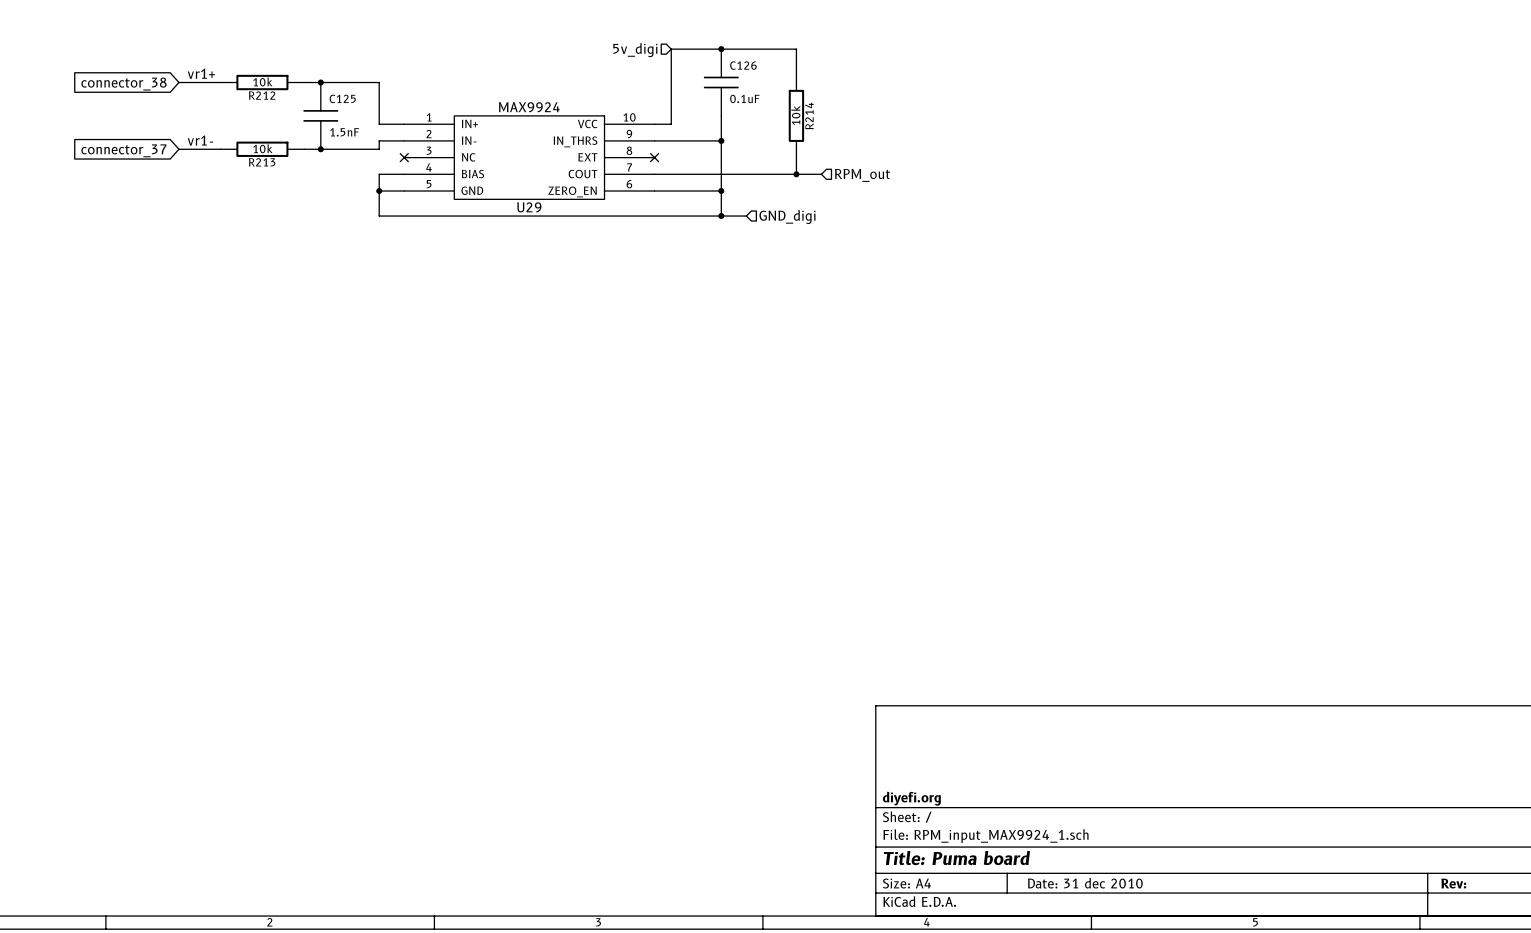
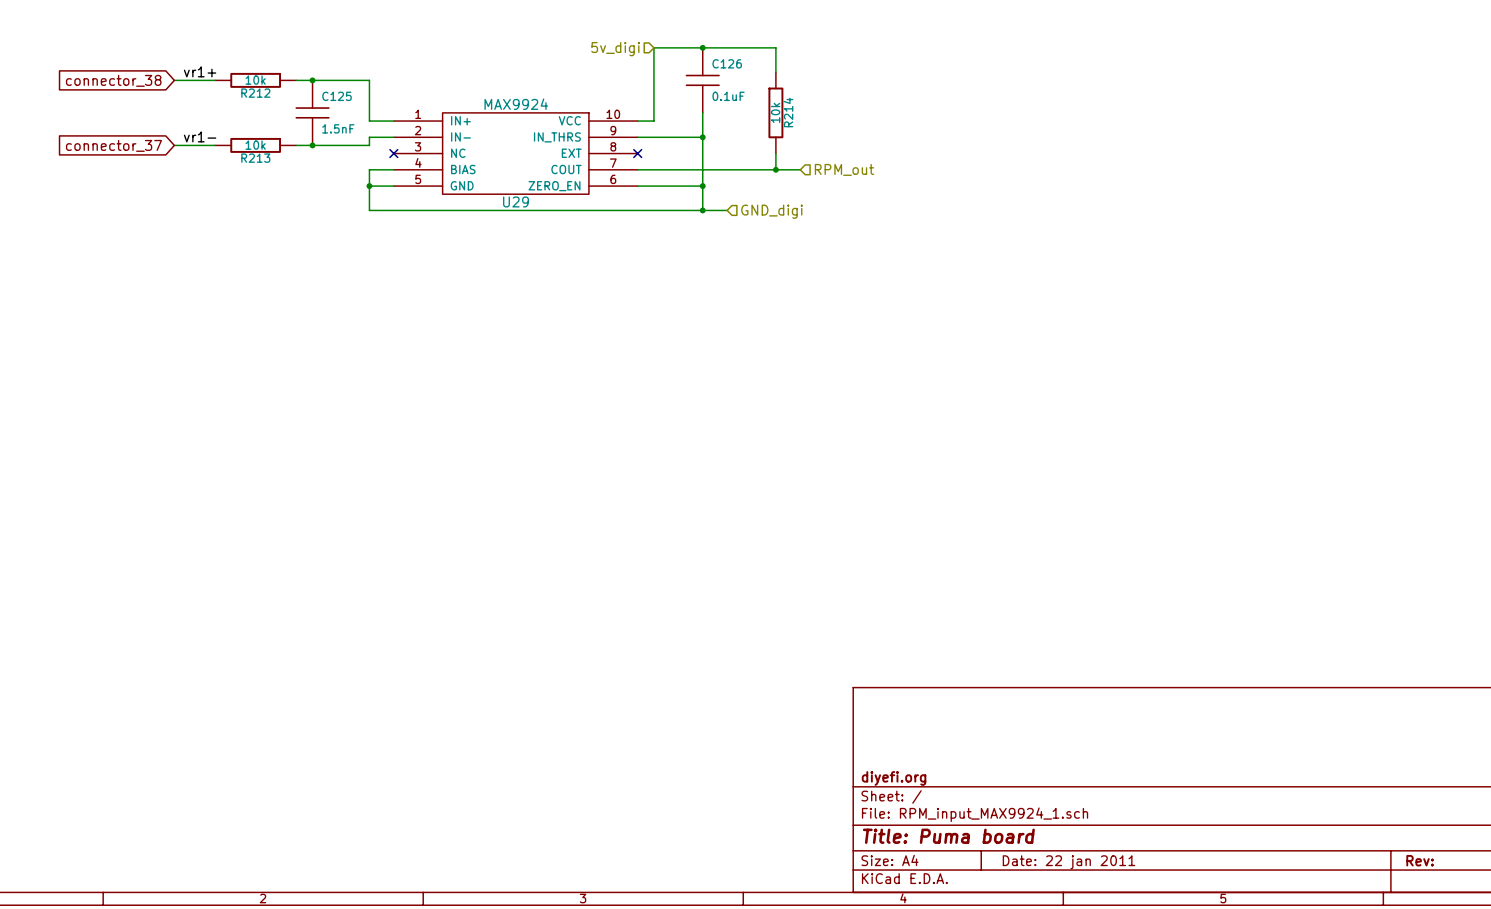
title block: Date: 31 dec 2010 (1085, 883) -> Date: 22 jan 2011 (1068, 862)

